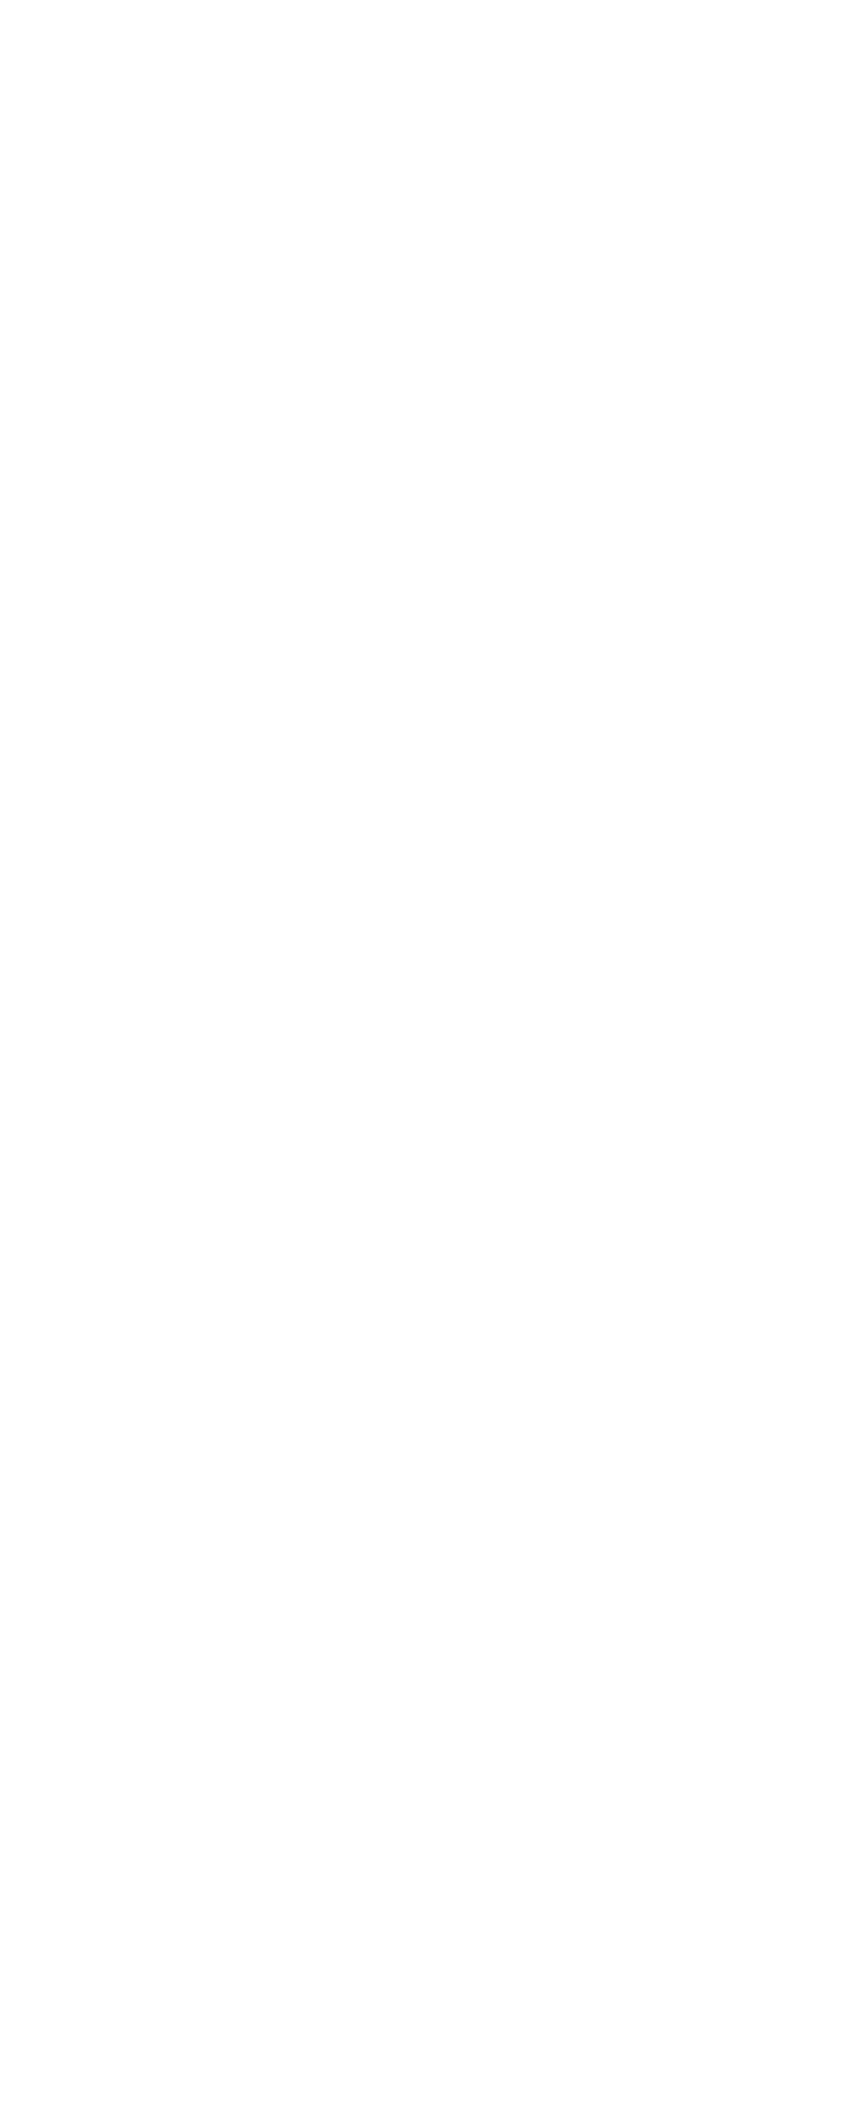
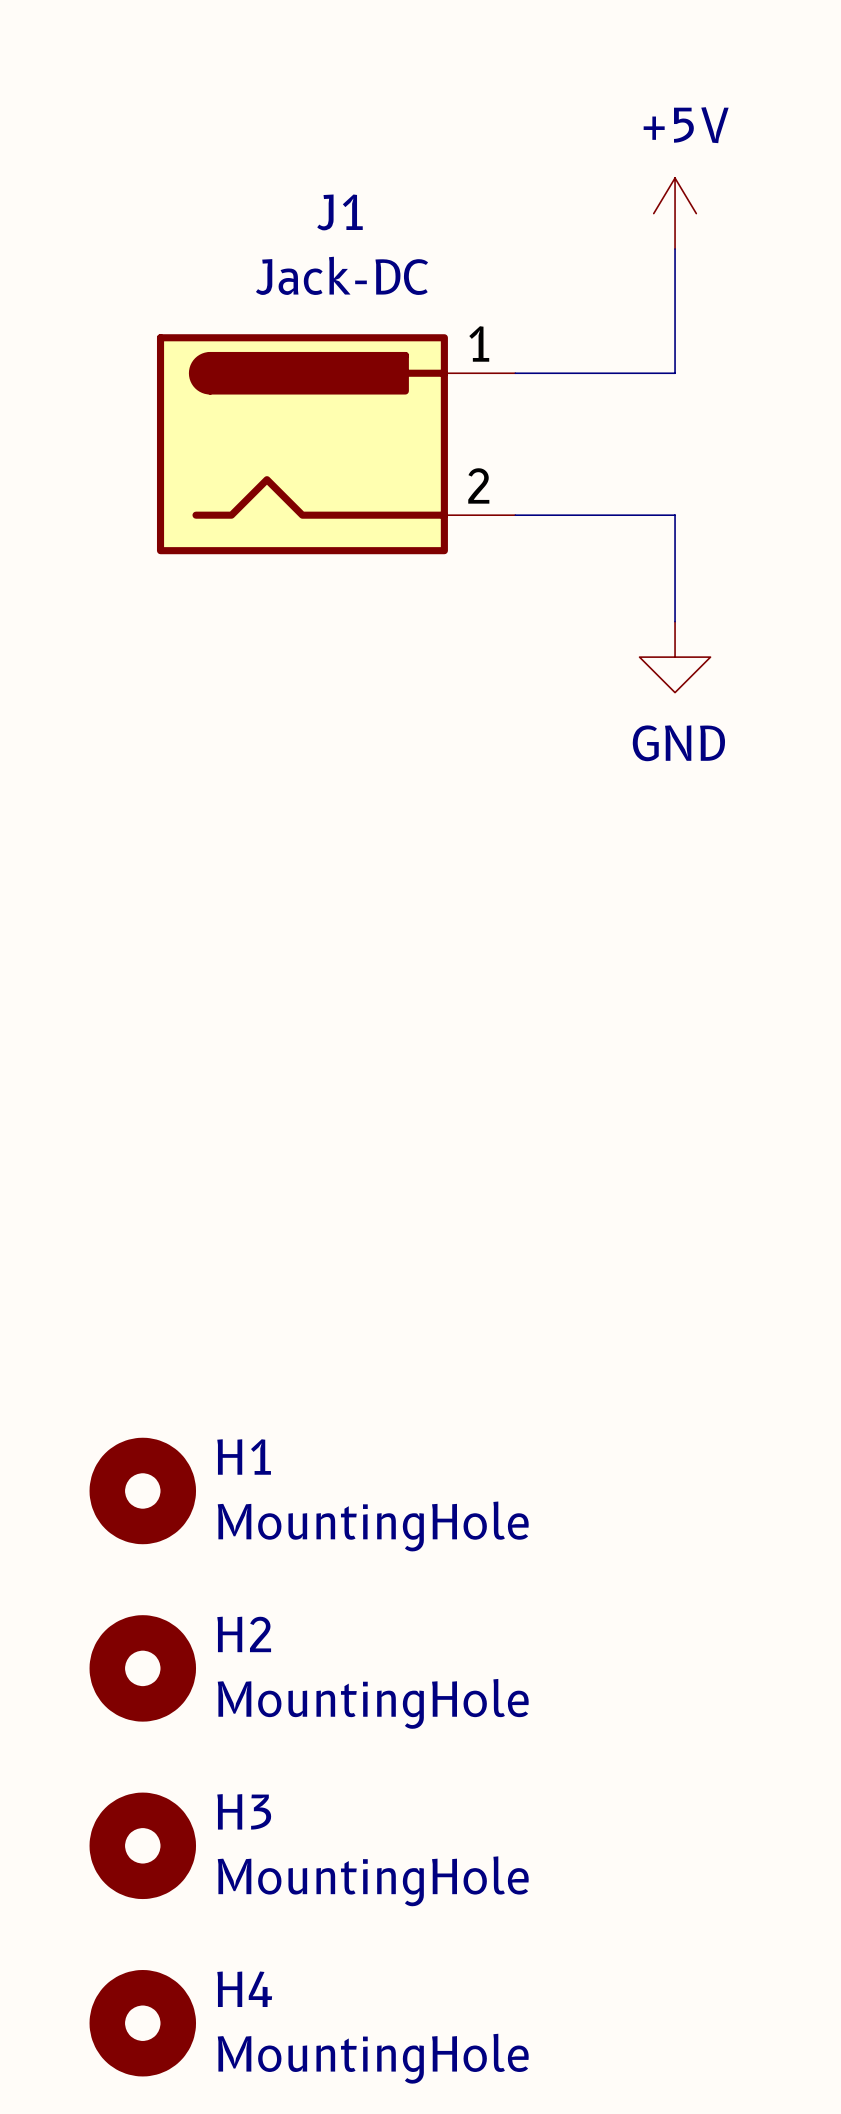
power symbol: none -> +5V (675, 213)
wire: none -> (675, 249) (675, 373) (515, 373)
J1: none -> Jack-DC (336, 444)
wire: none -> (515, 515) (675, 515) (675, 621)
power symbol: none -> GND (675, 657)
H1: none -> MountingHole (142, 1490)
H2: none -> MountingHole (142, 1668)
H3: none -> MountingHole (142, 1845)
H4: none -> MountingHole (142, 2023)

